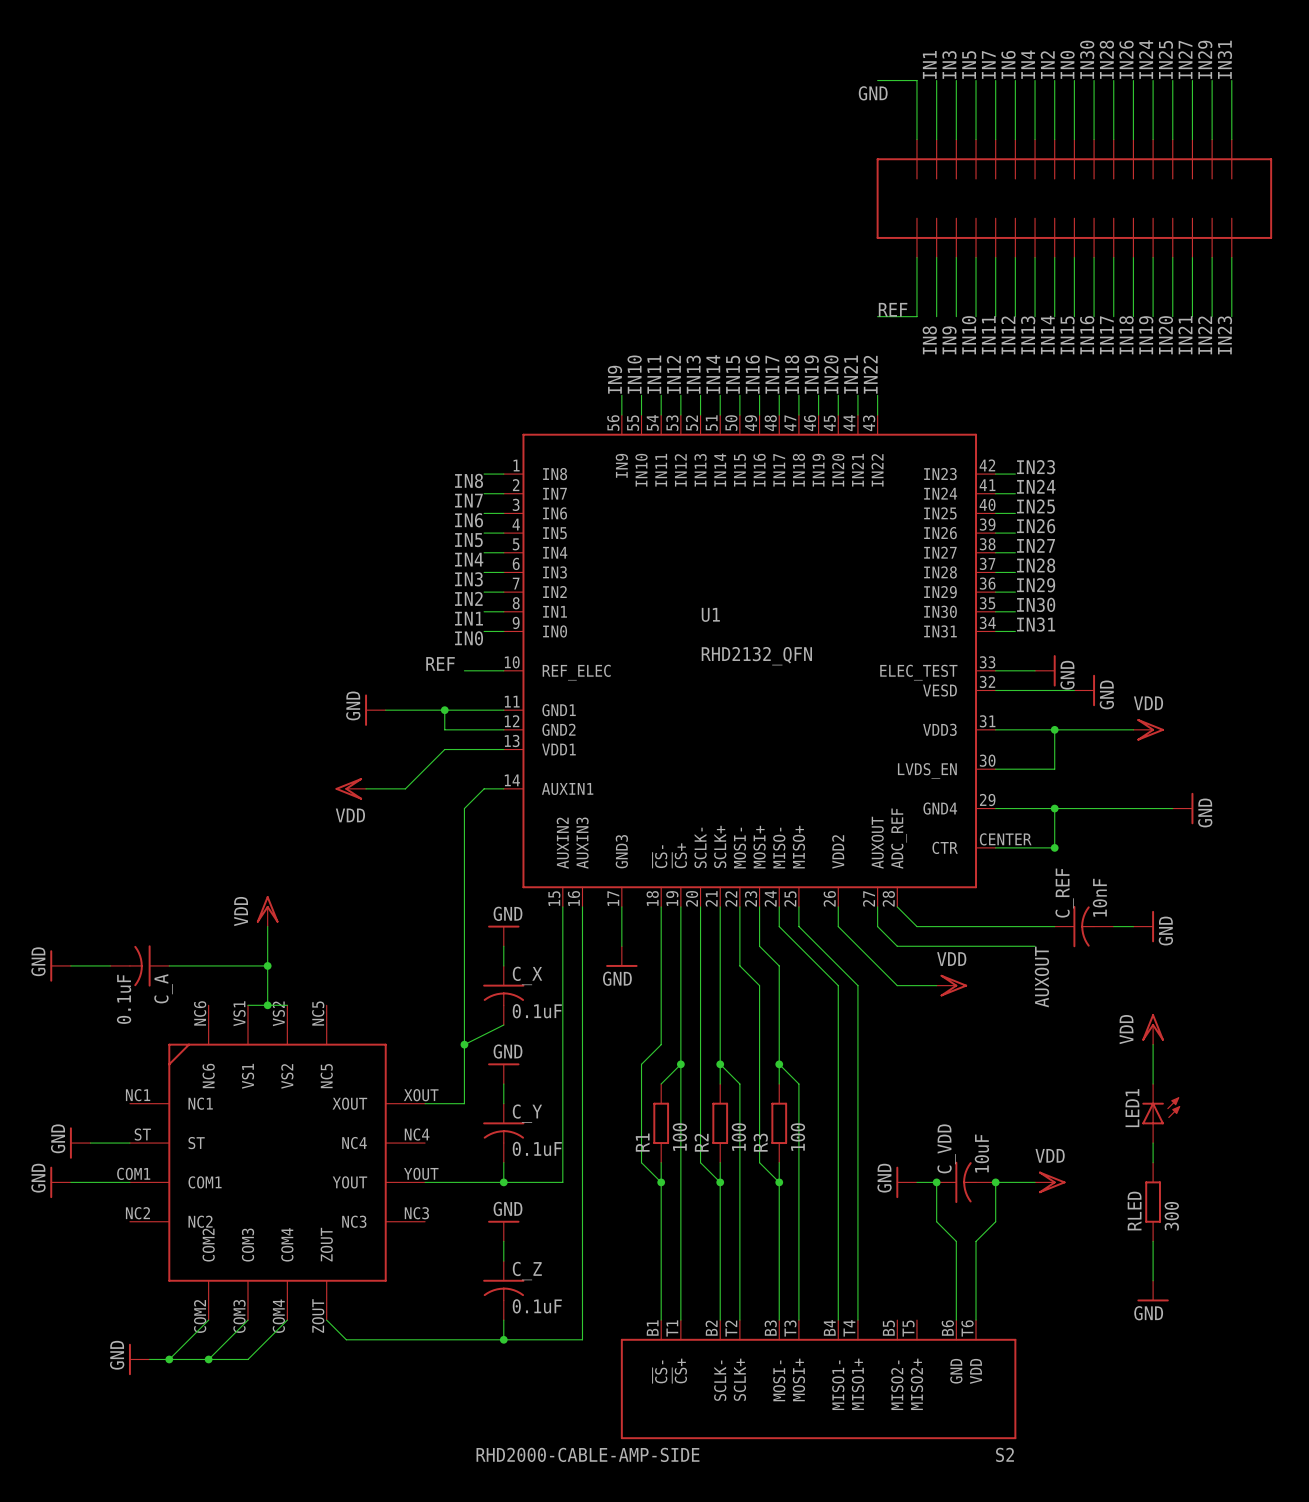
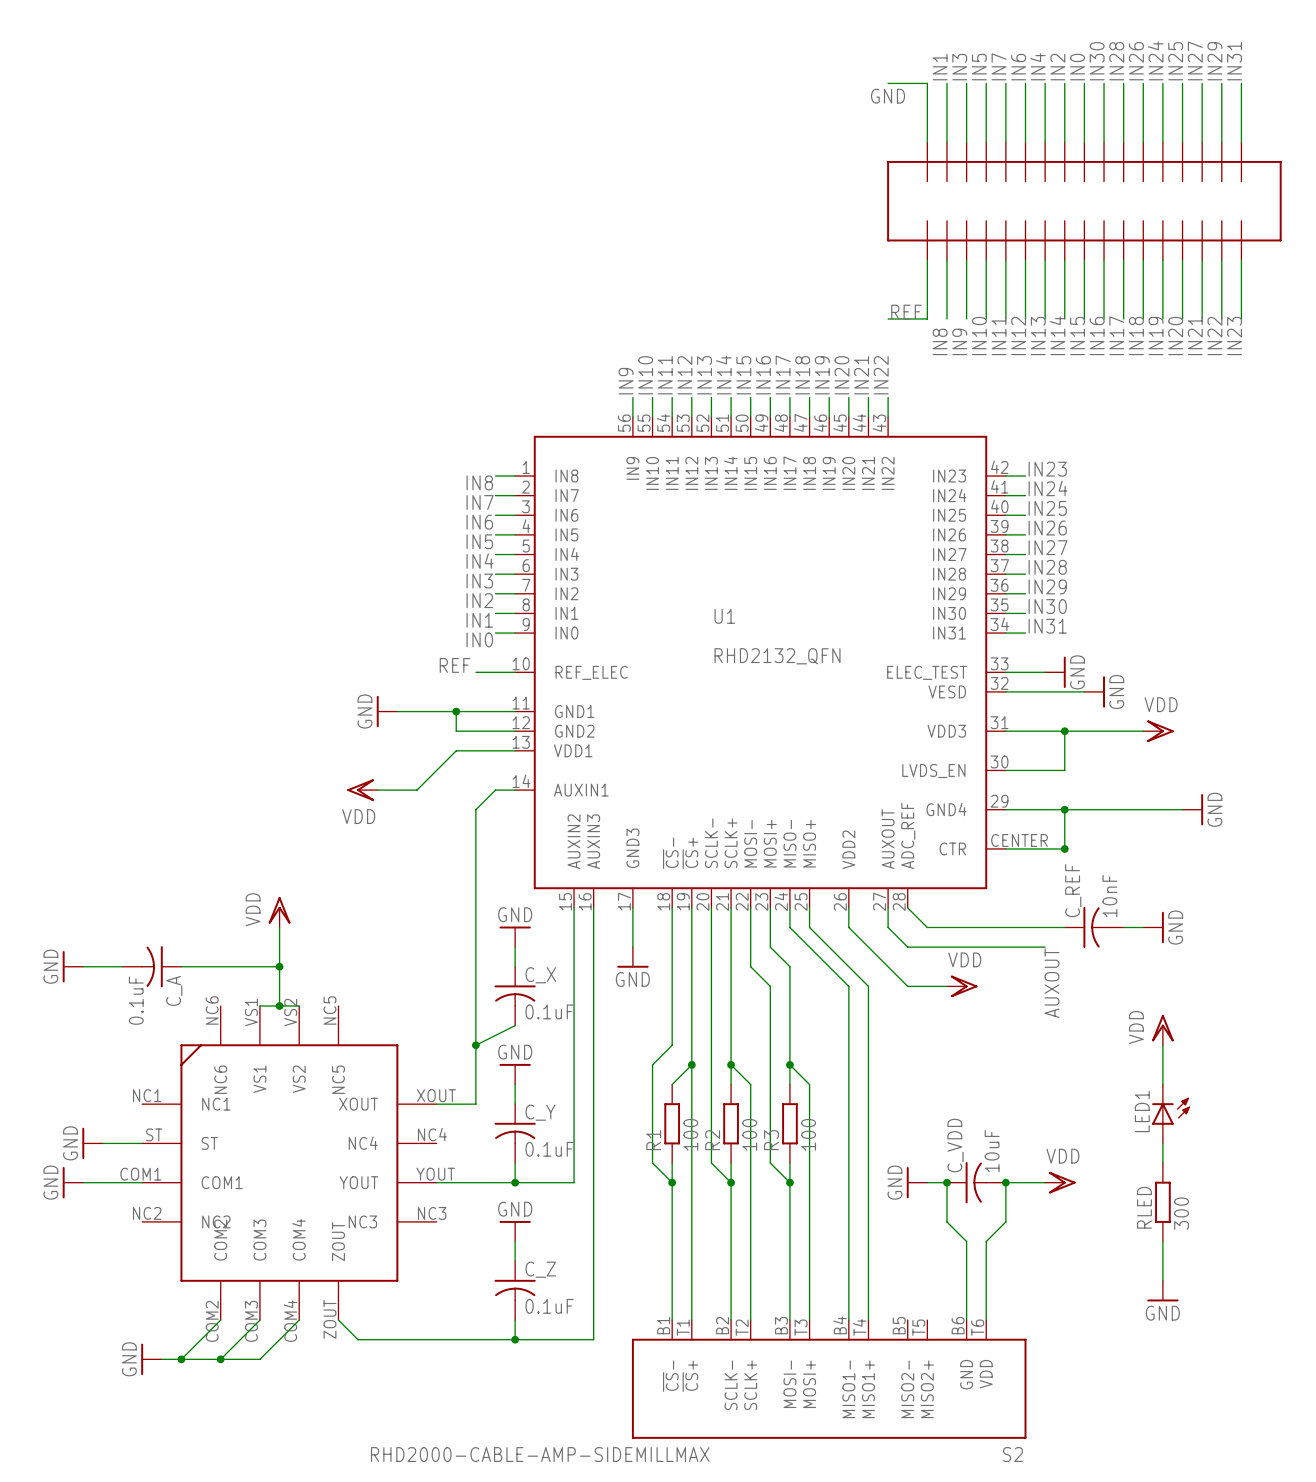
S2 value: RHD2000-CABLE-AMP-SIDE (587, 1454) -> RHD2000-CABLE-AMP-SIDEMILLMAX (540, 1454)

